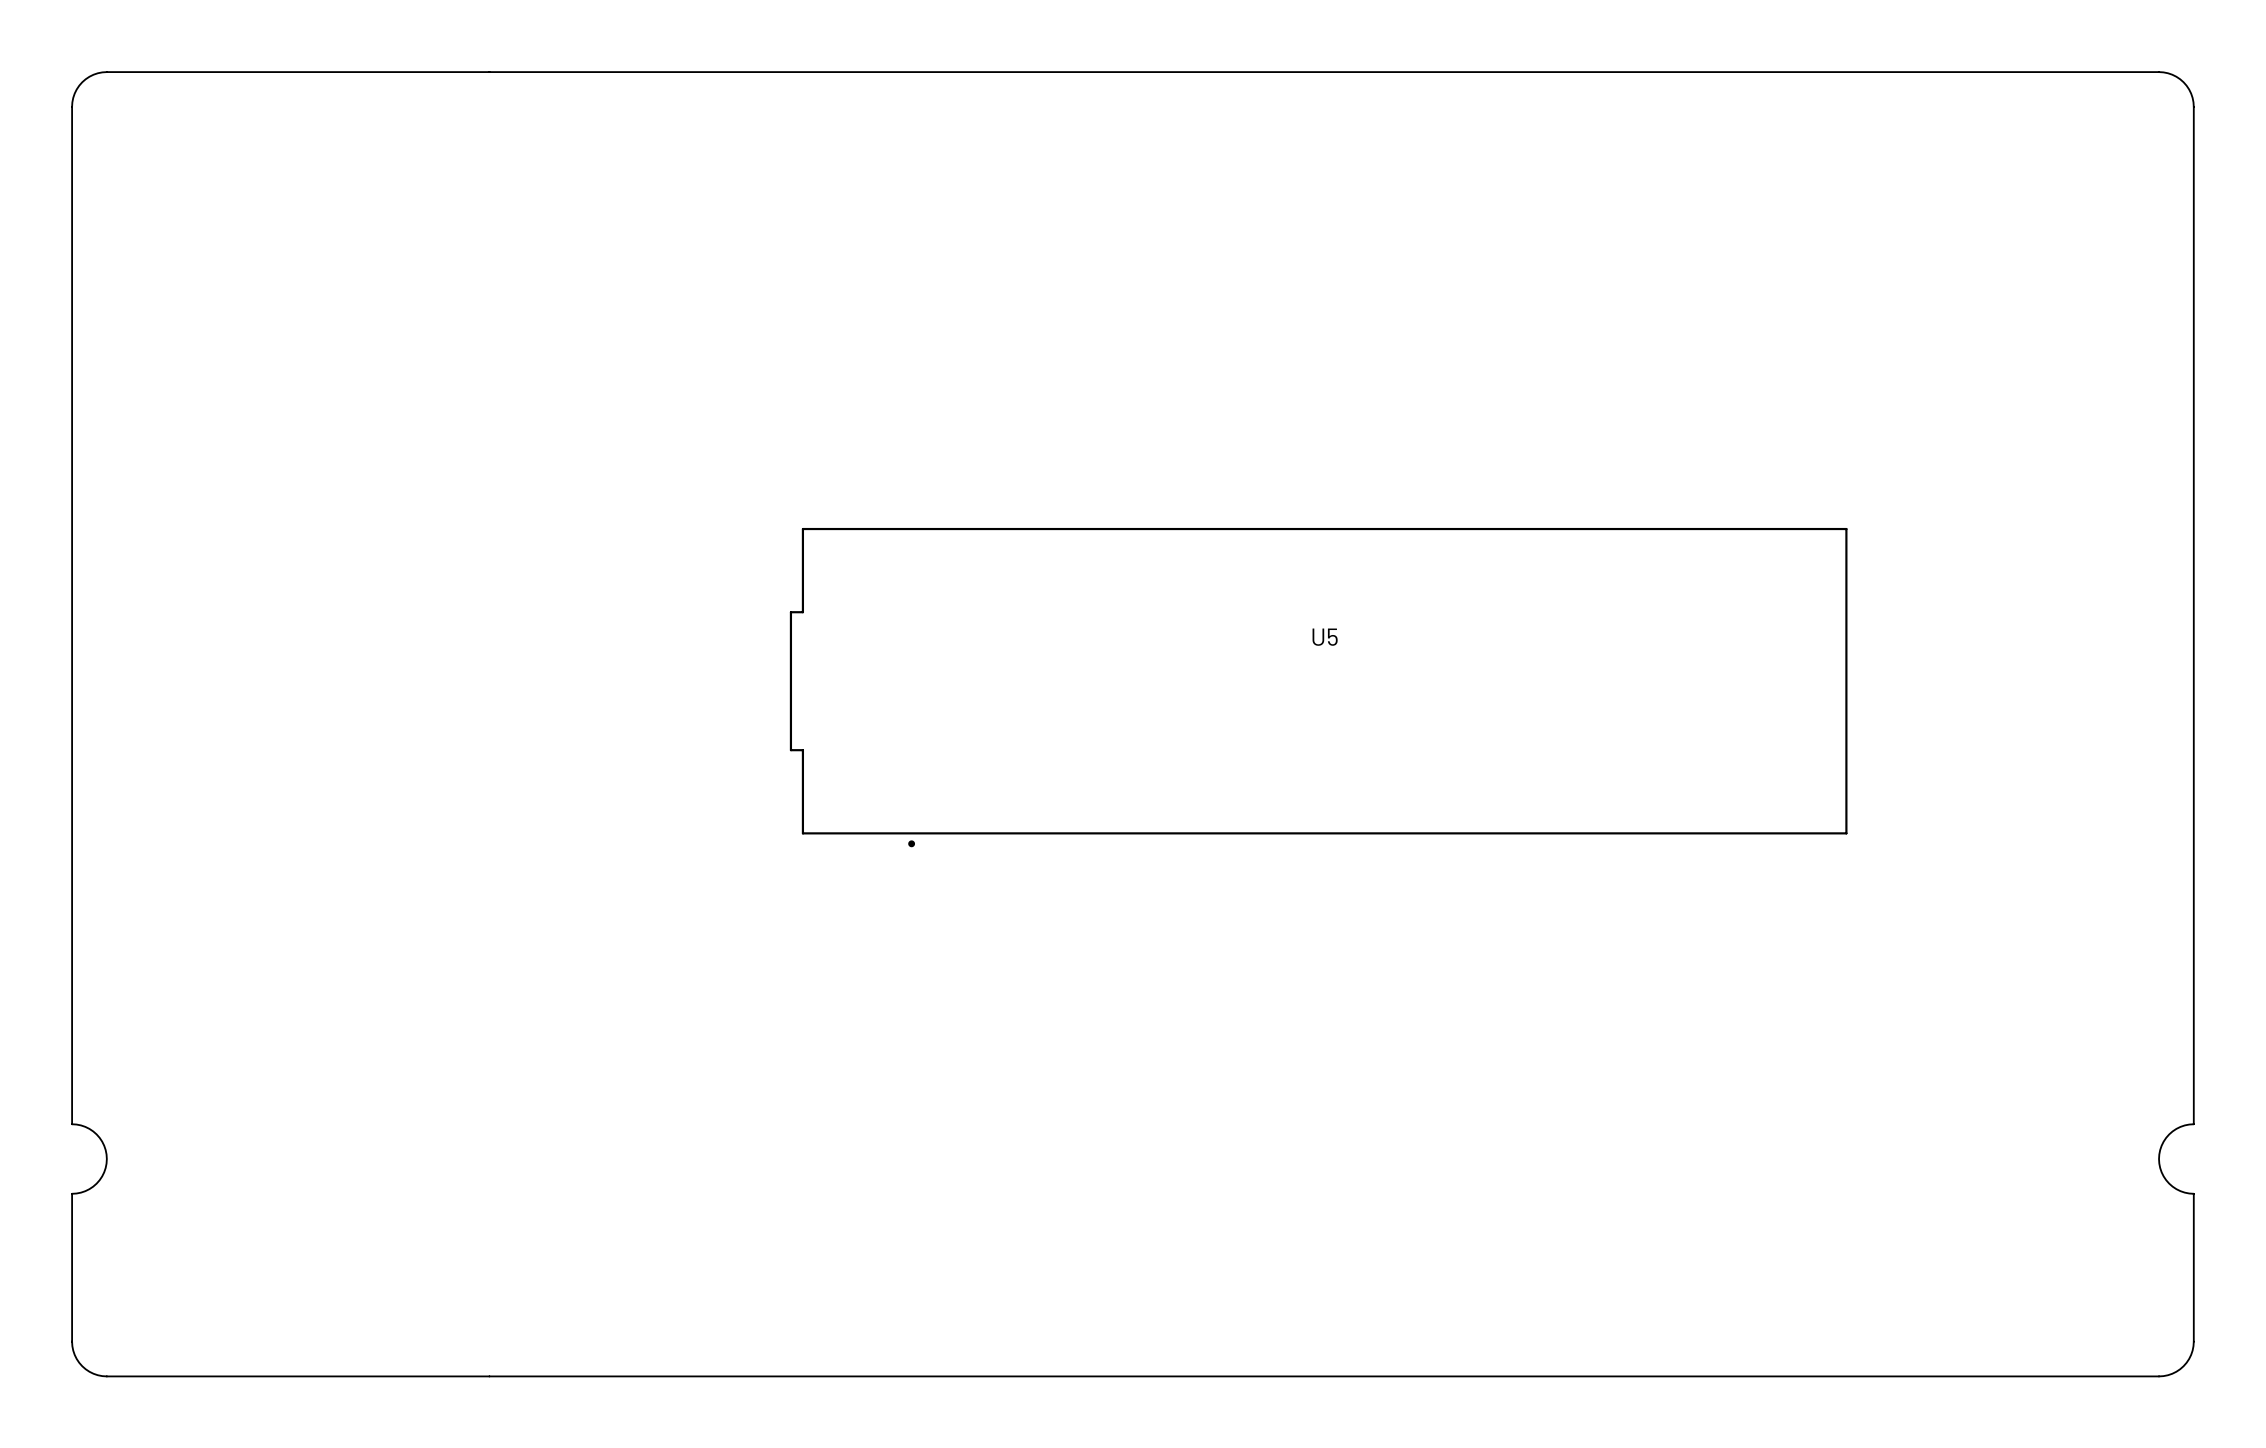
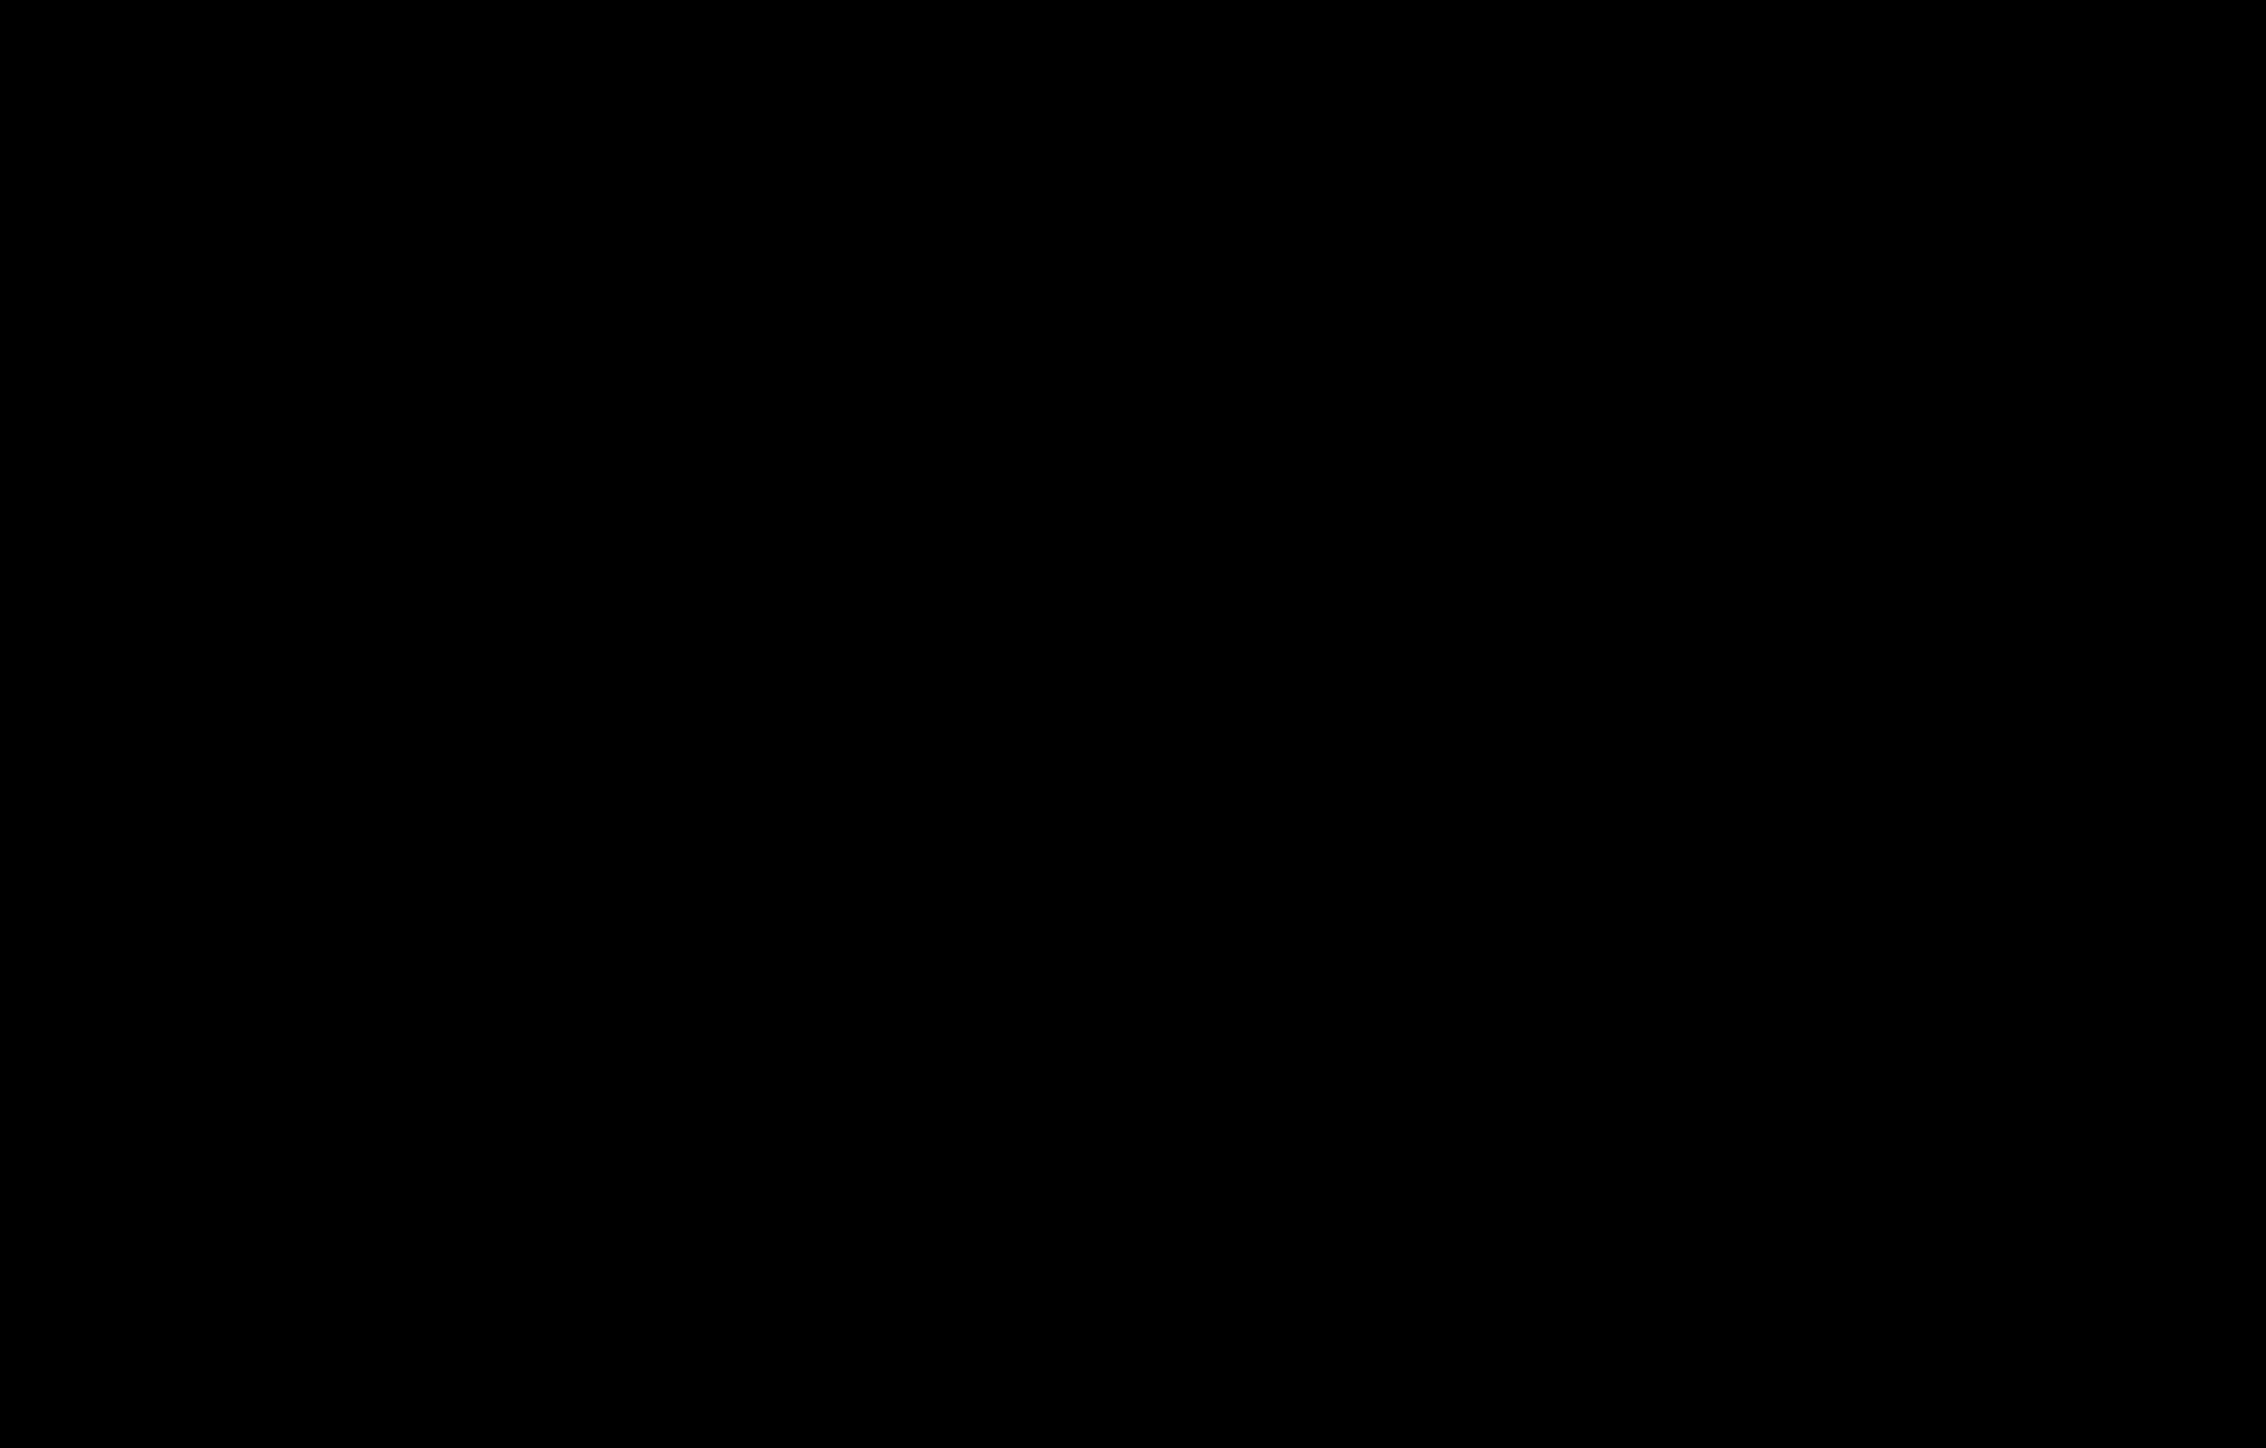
board edge: (106, 72) (2159, 72) (2176, 76) (2189, 89) (2193, 106) (2193, 1124) (2180, 1126) (2169, 1134) (2161, 1145) (2159, 1159) (2161, 1172) (2169, 1183) (2180, 1191) (2193, 1193) (2193, 1341) (2189, 1359) (2176, 1371) (2159, 1376) (106, 1376) (89, 1371) (76, 1359) (72, 1346) (72, 1193) (85, 1191) (96, 1183) (104, 1172) (106, 1159) (104, 1145) (96, 1134) (85, 1126) (72, 1124) (72, 106) (74, 93) (82, 82) (93, 74) (106, 72) -> none
U5: (1318, 687) -> none

